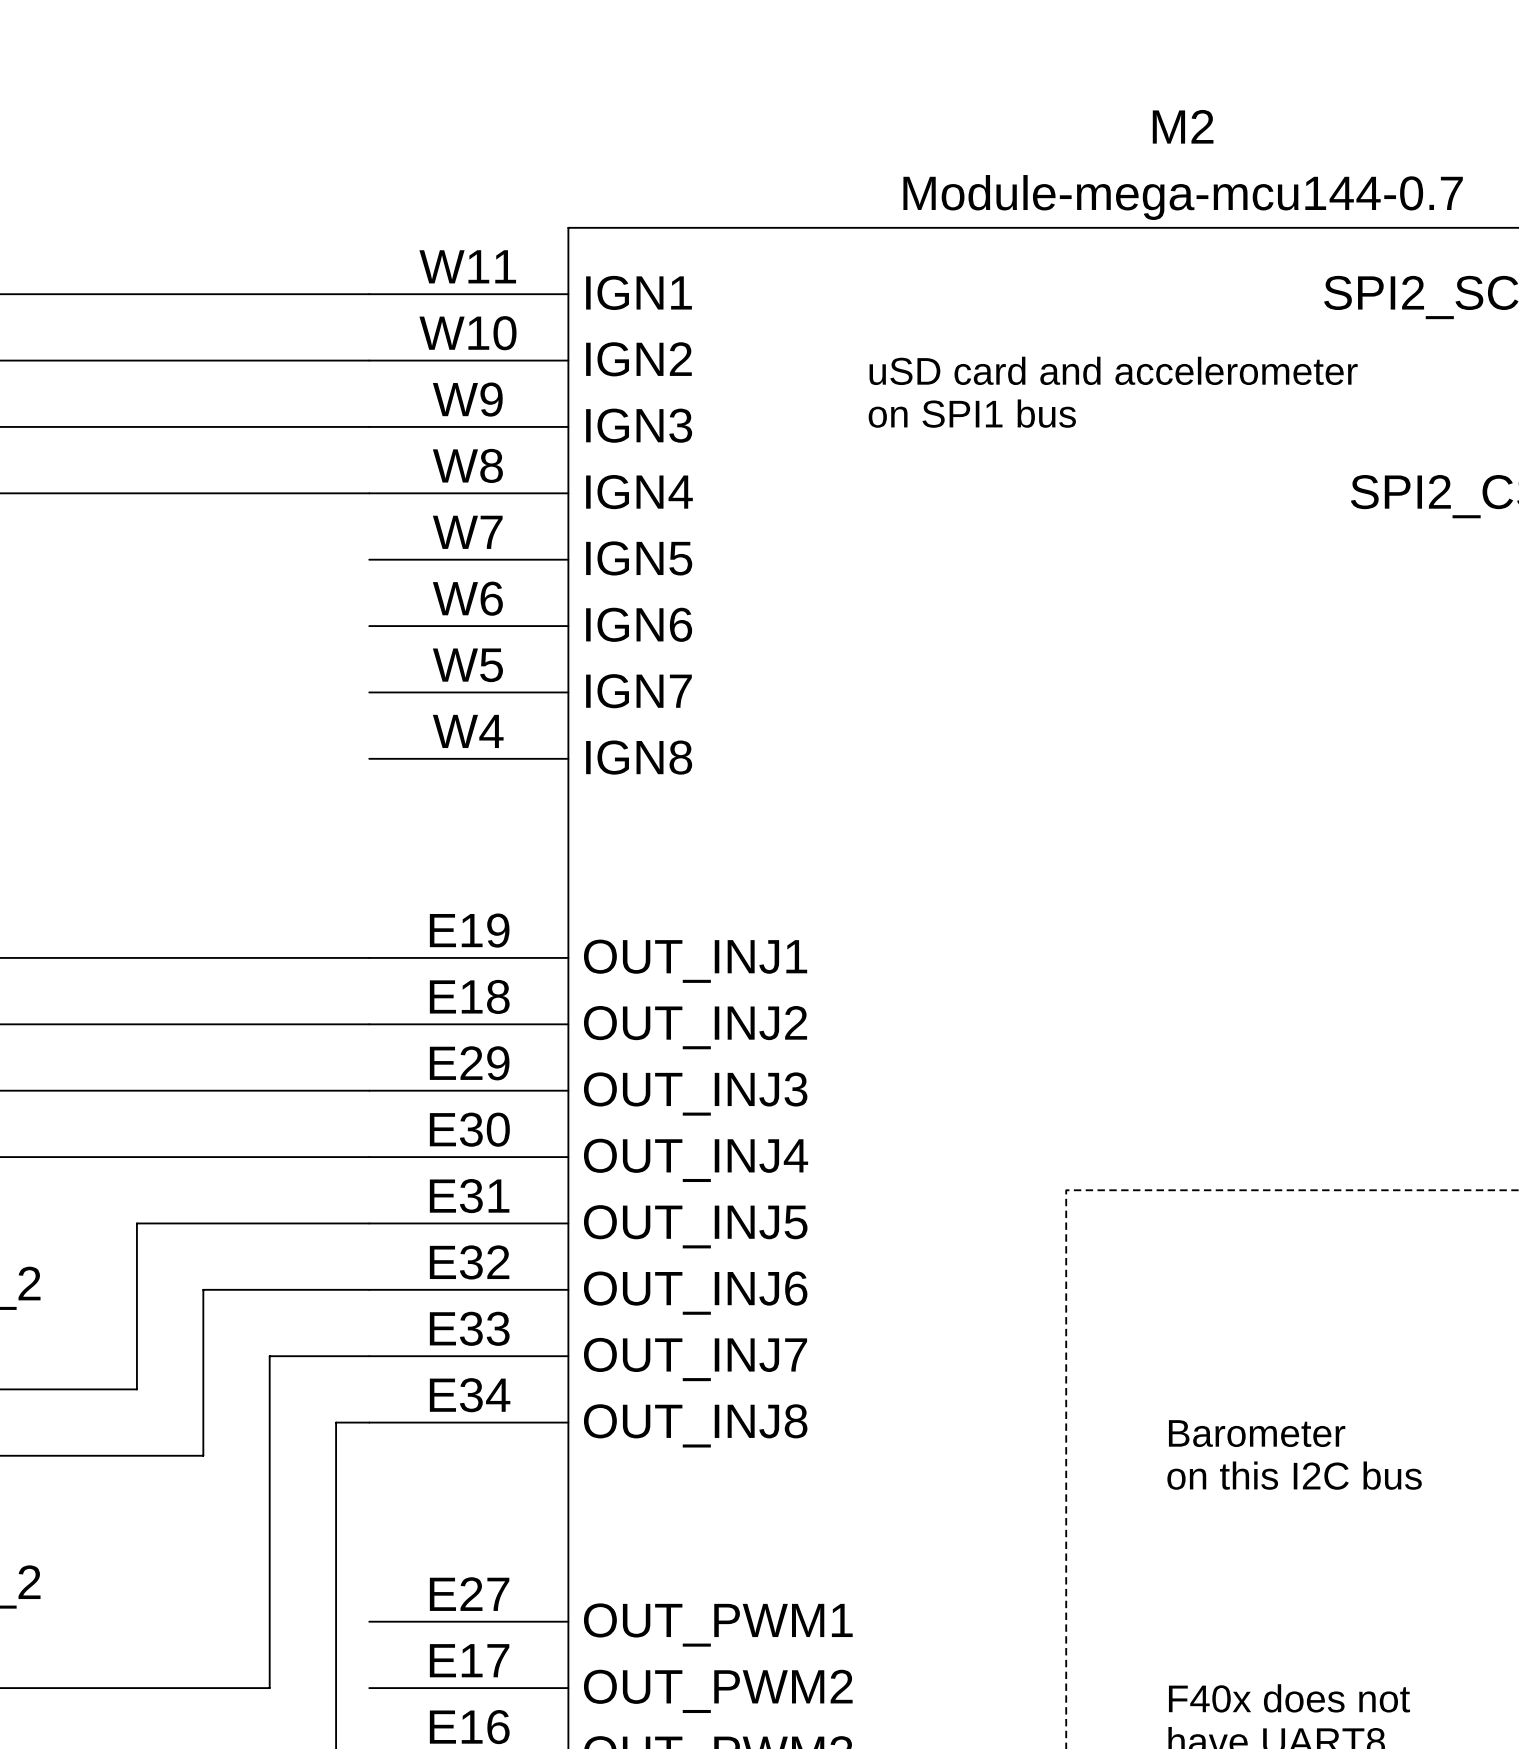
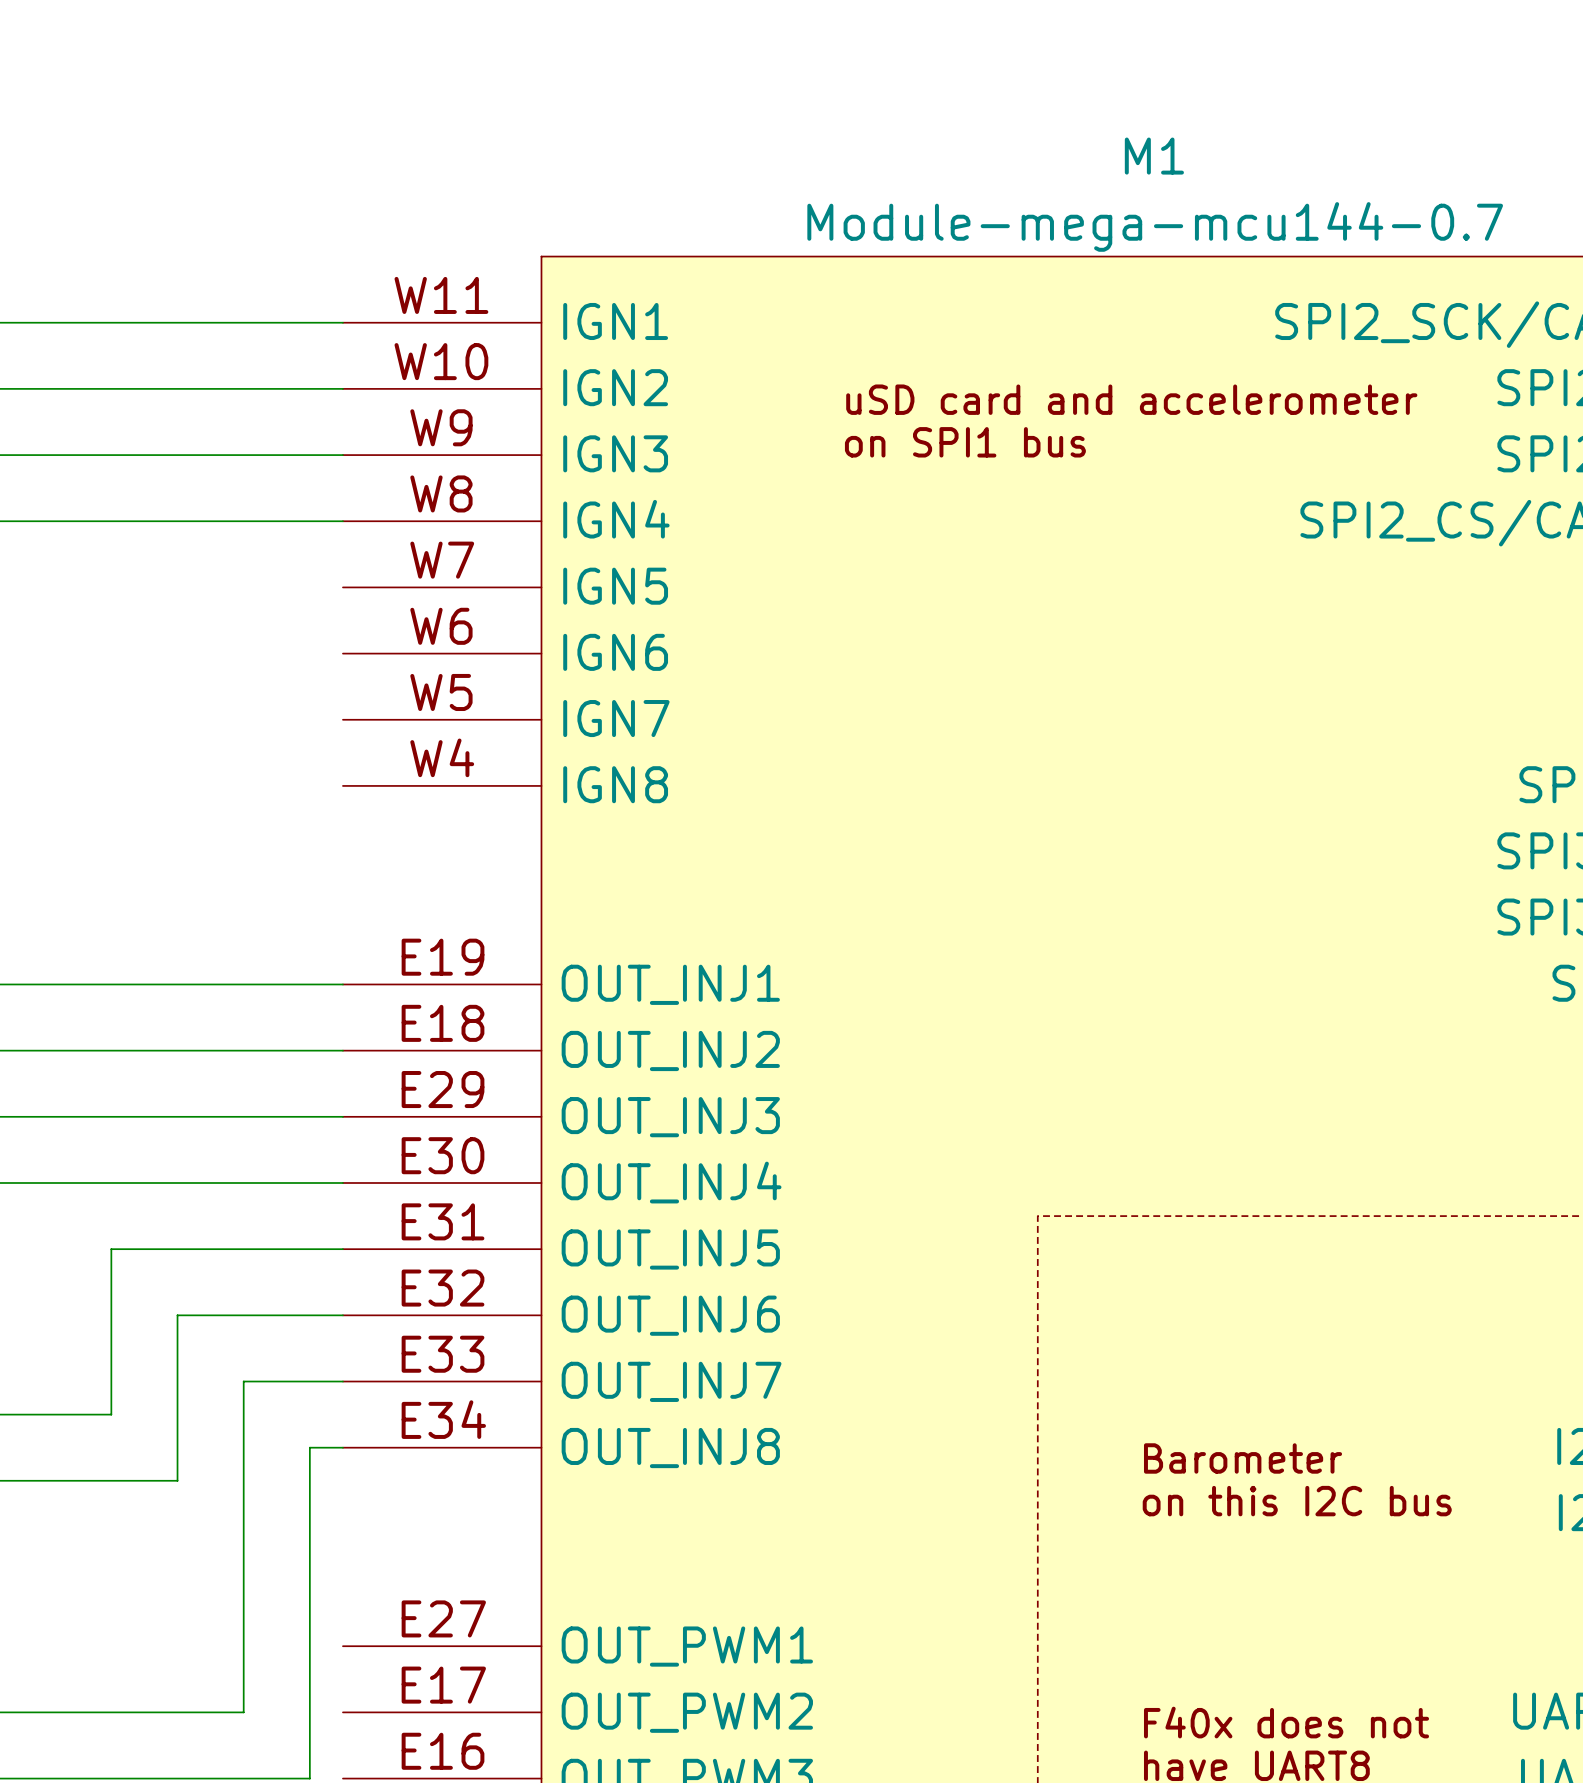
M2 name: M2 (1183, 126) -> M1 (1154, 156)

